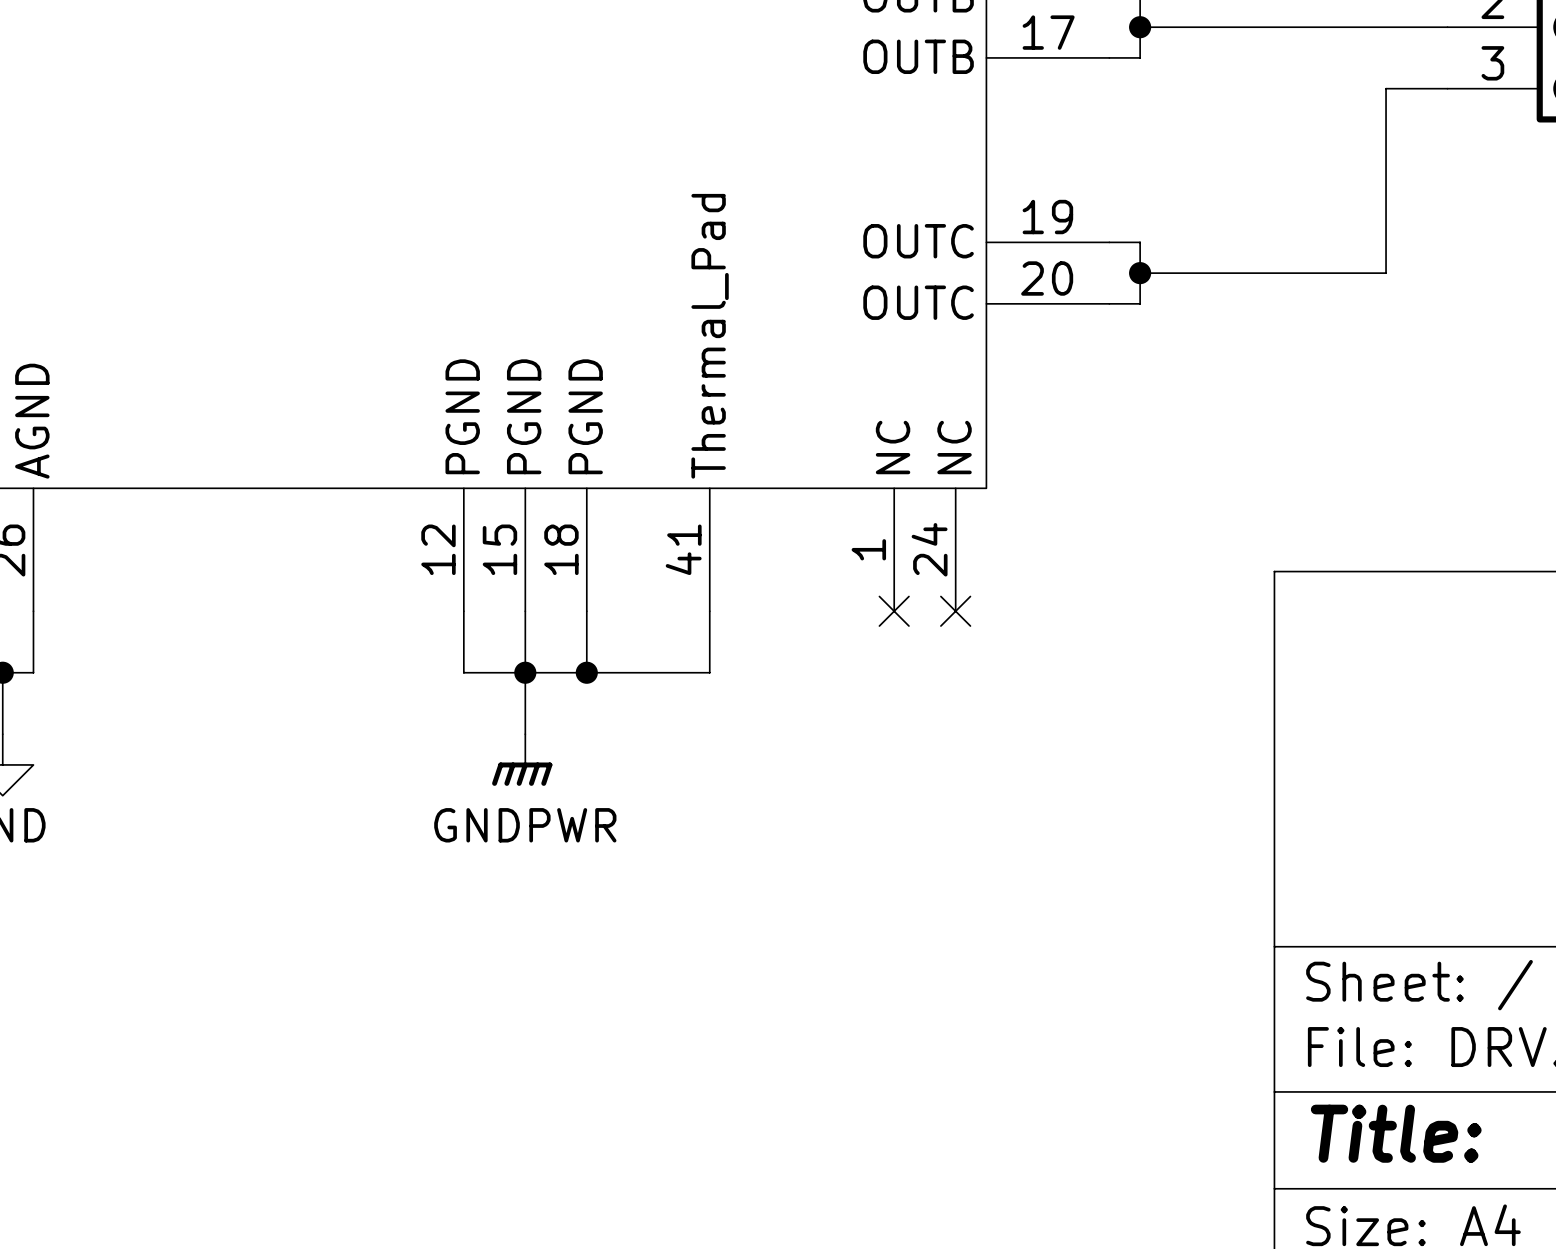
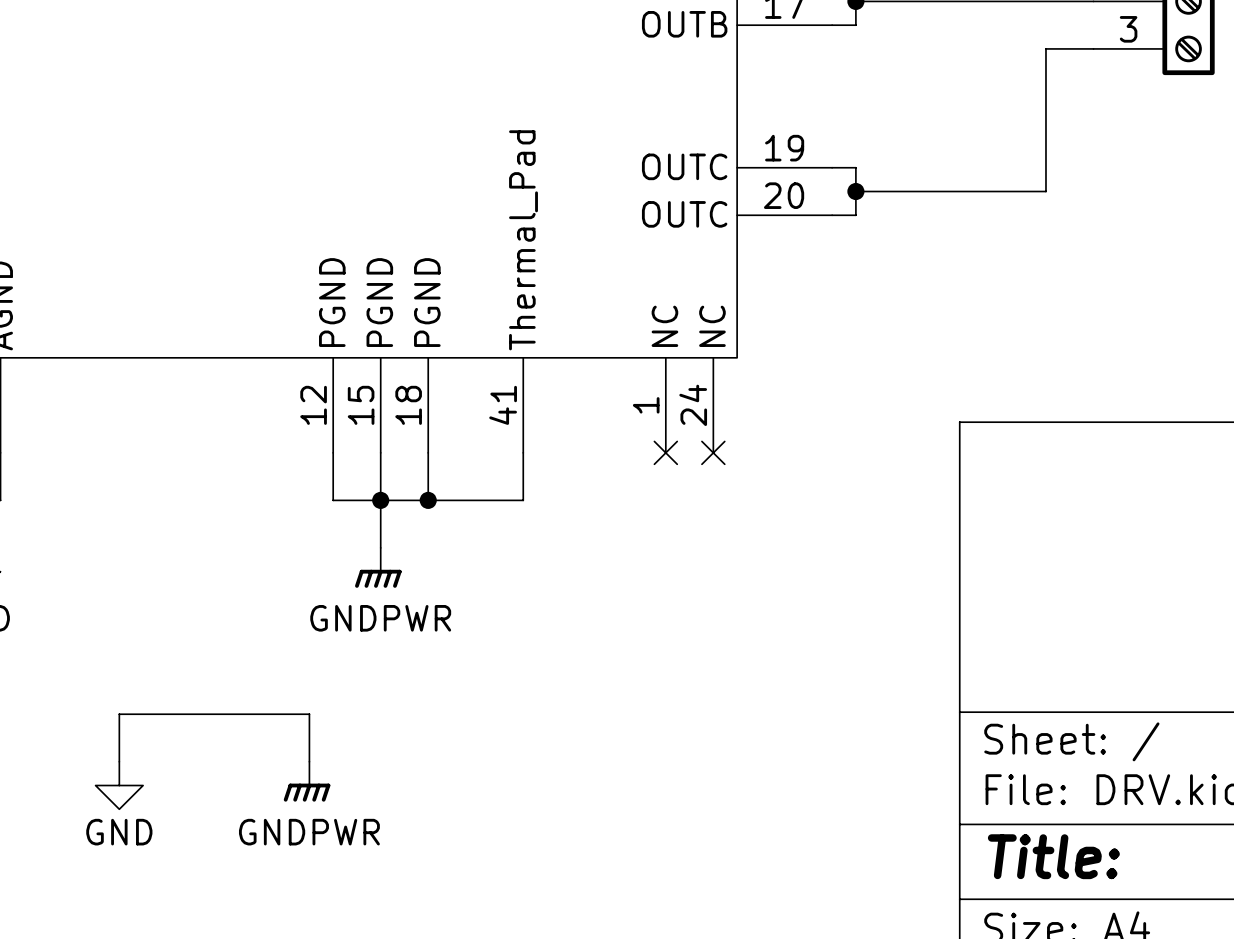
wire: none -> (119, 761) (119, 714) (309, 714) (309, 761)
power symbol: none -> GNDPWR (307, 781)
power symbol: none -> GND (119, 785)

